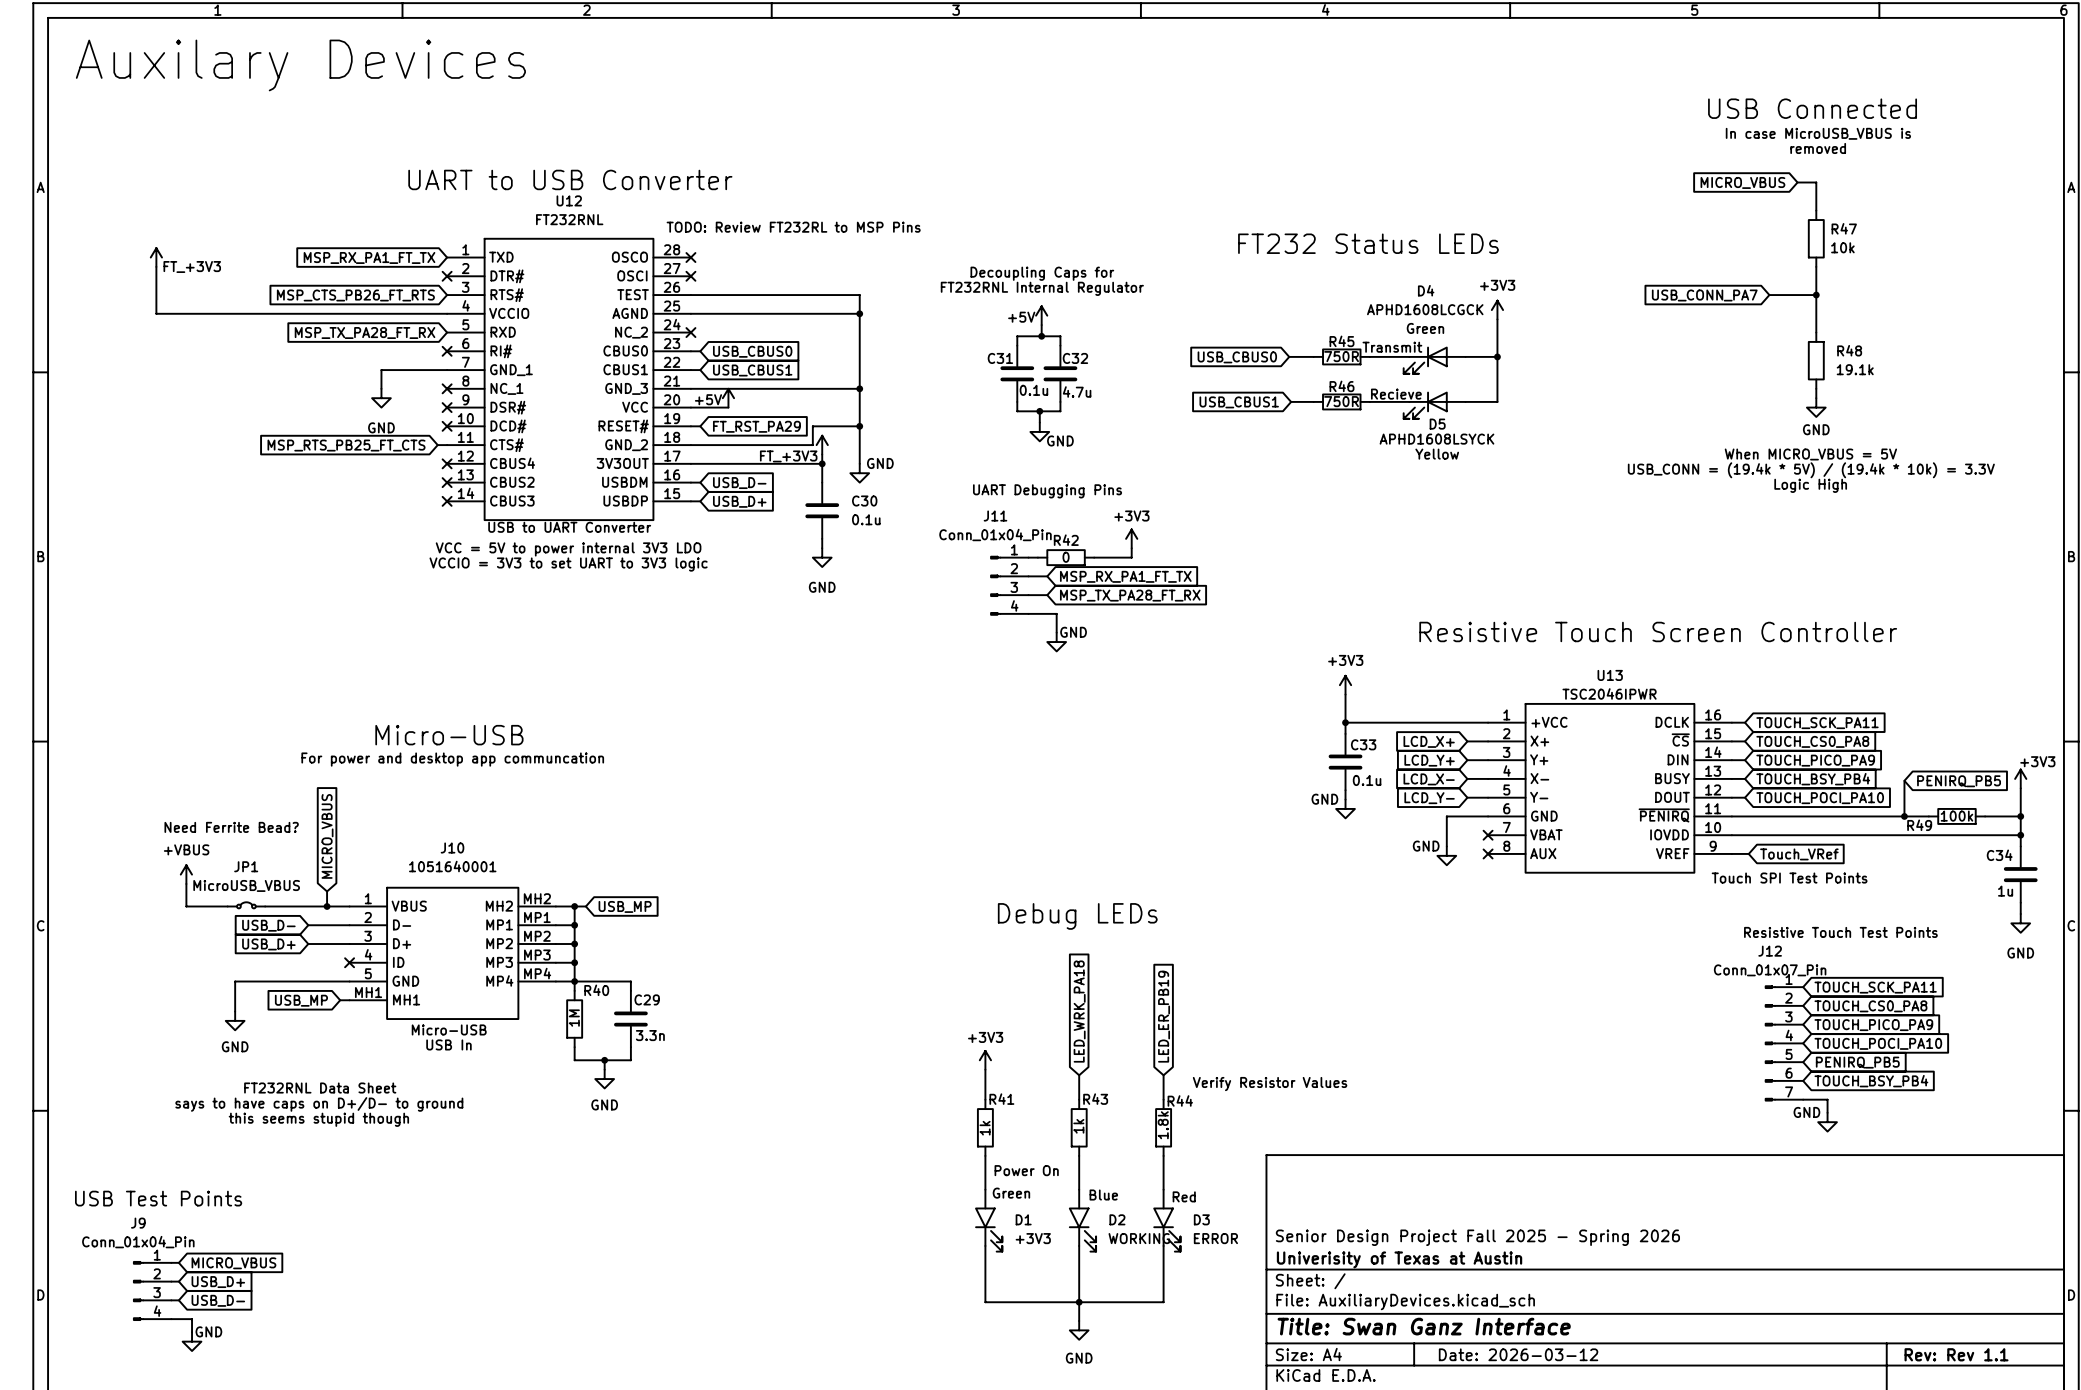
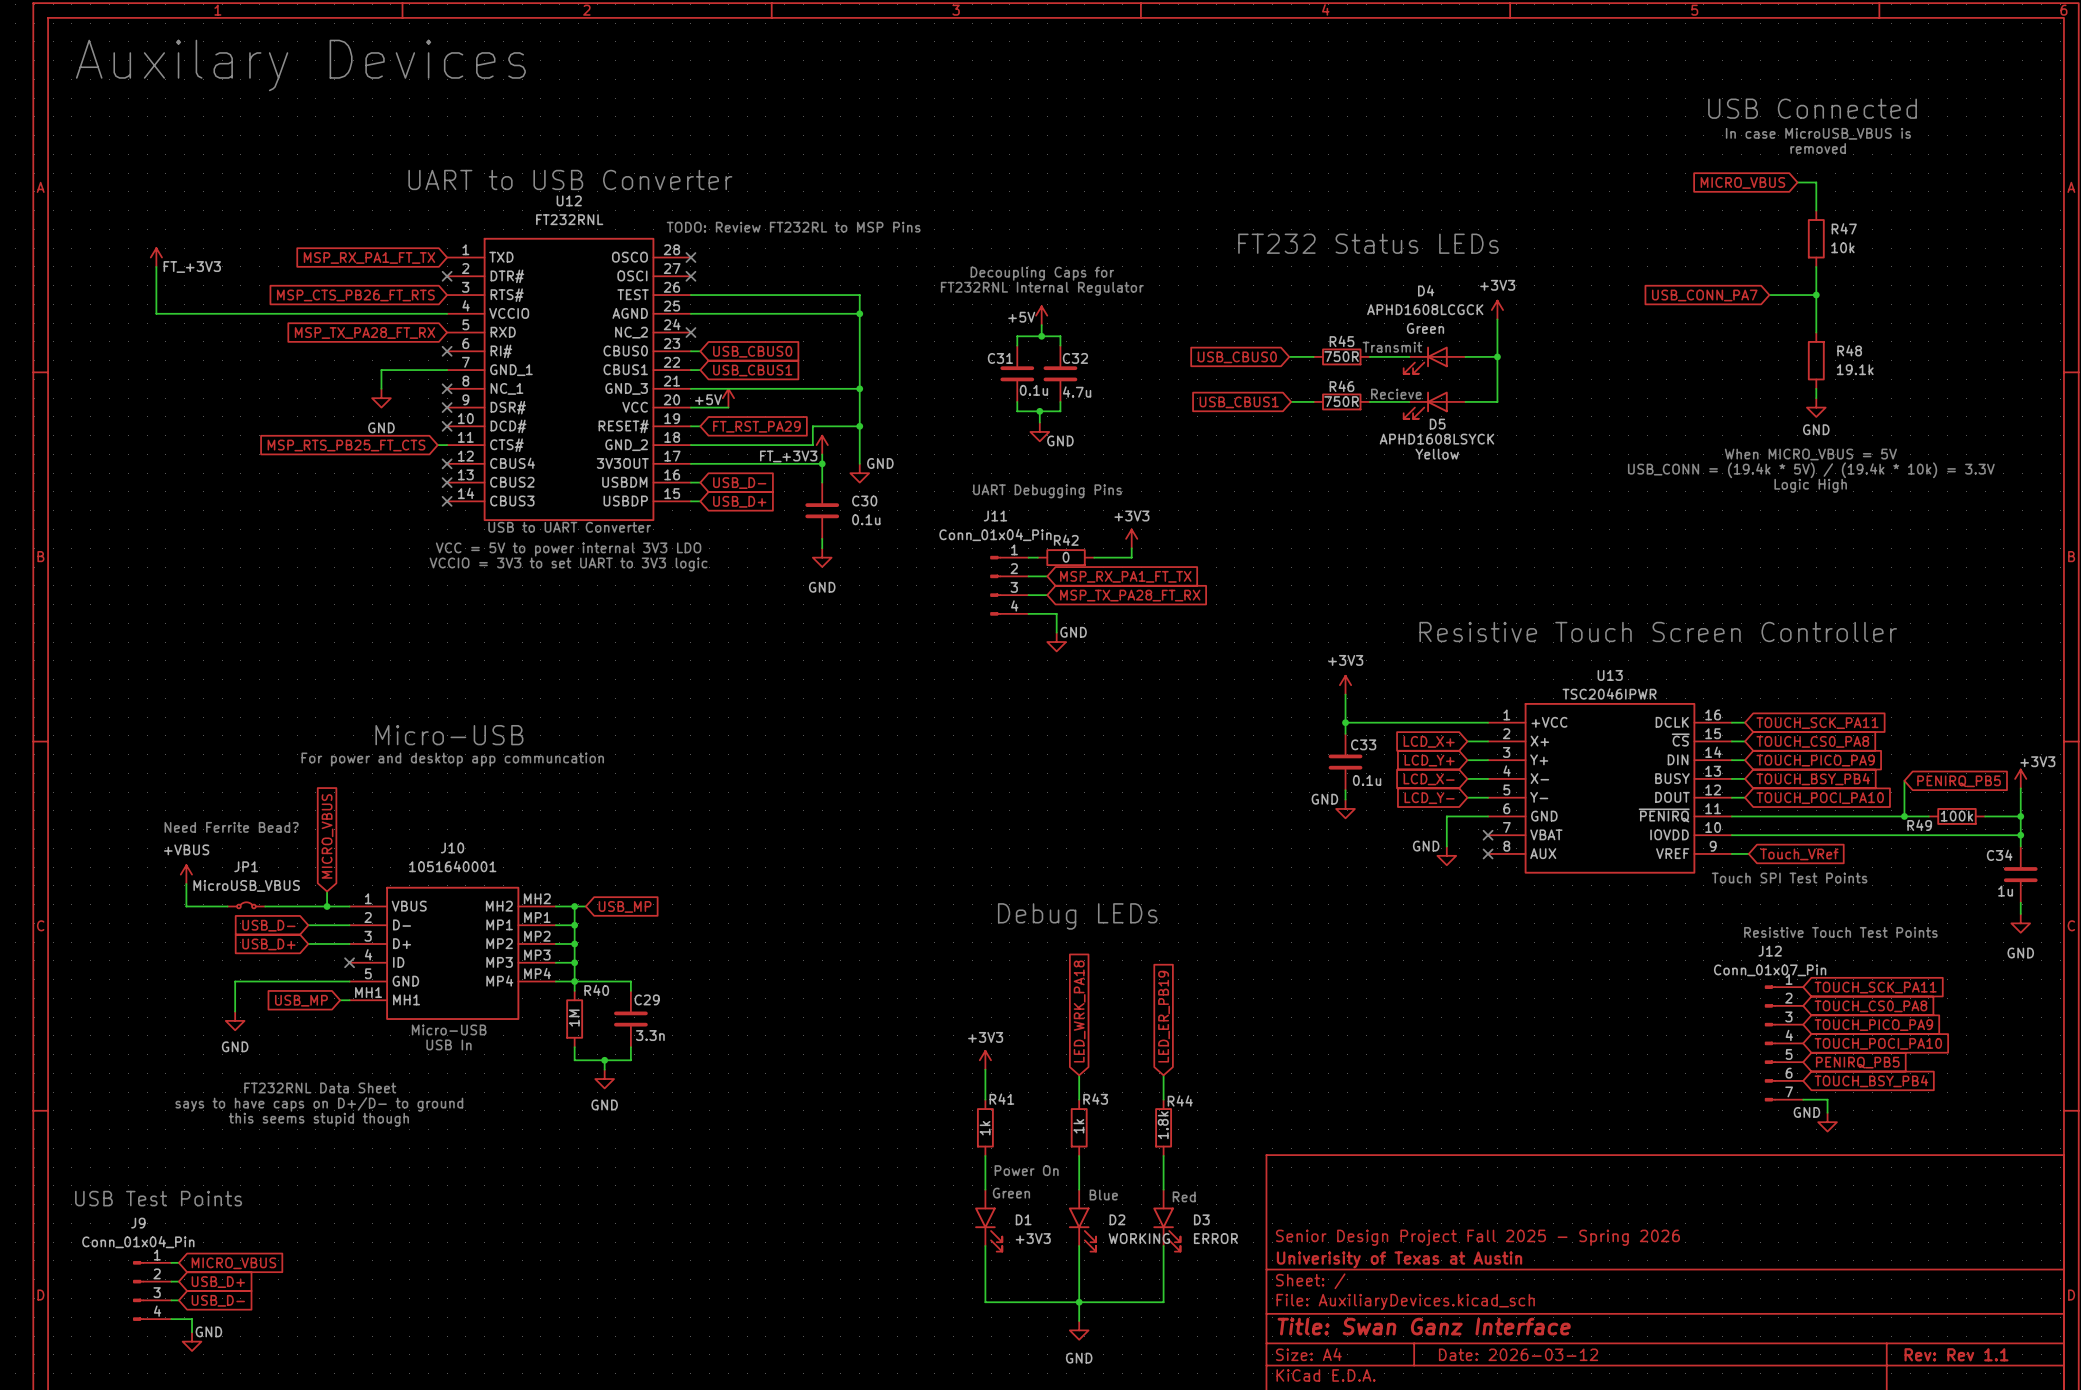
text: Verify Resistor Values (1270, 1084) -> none

